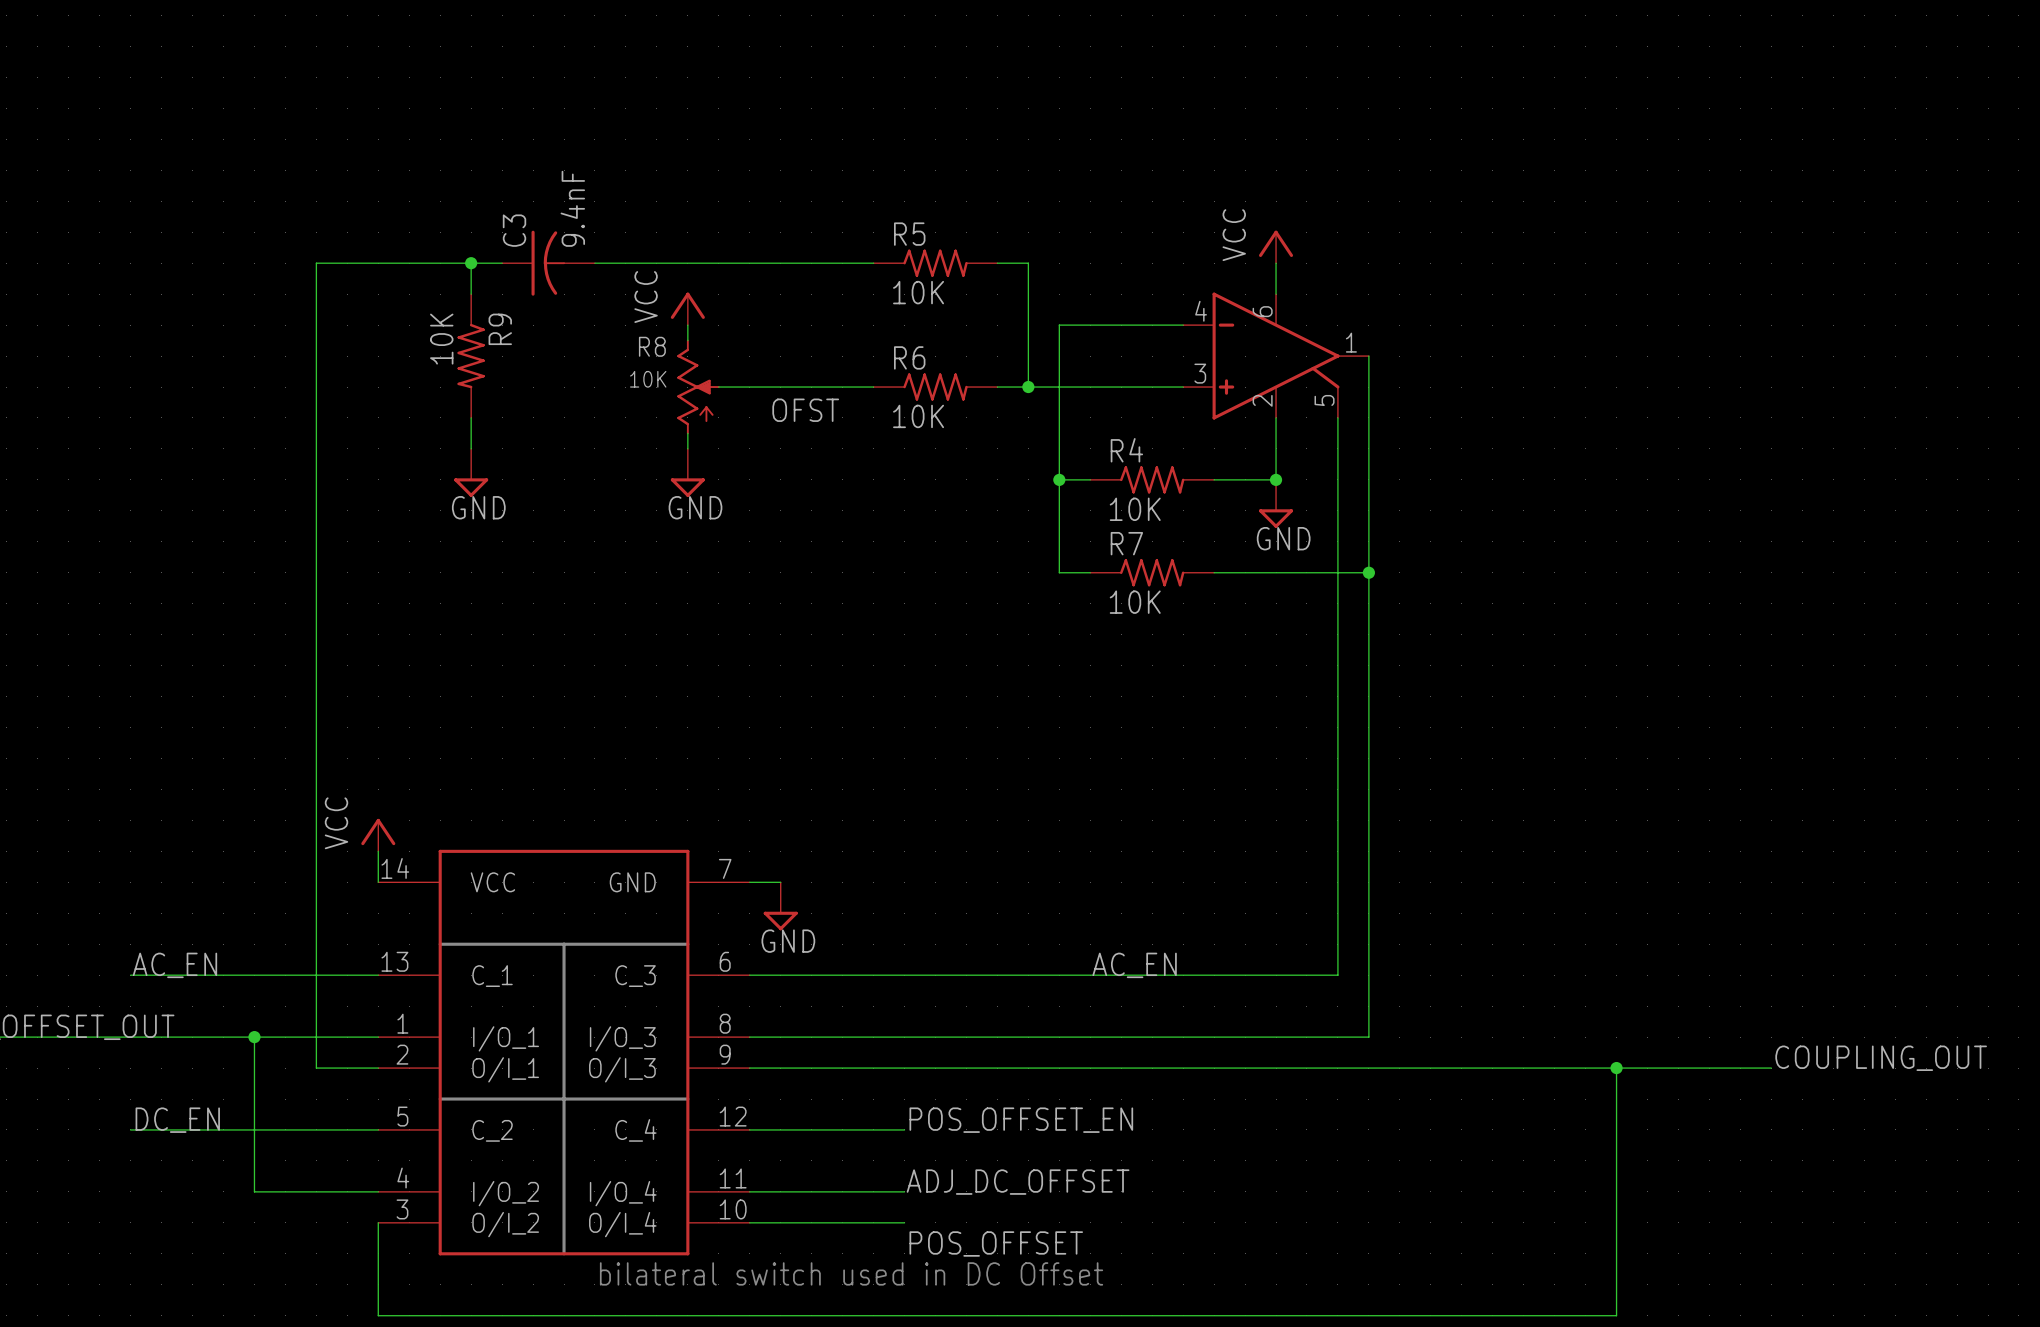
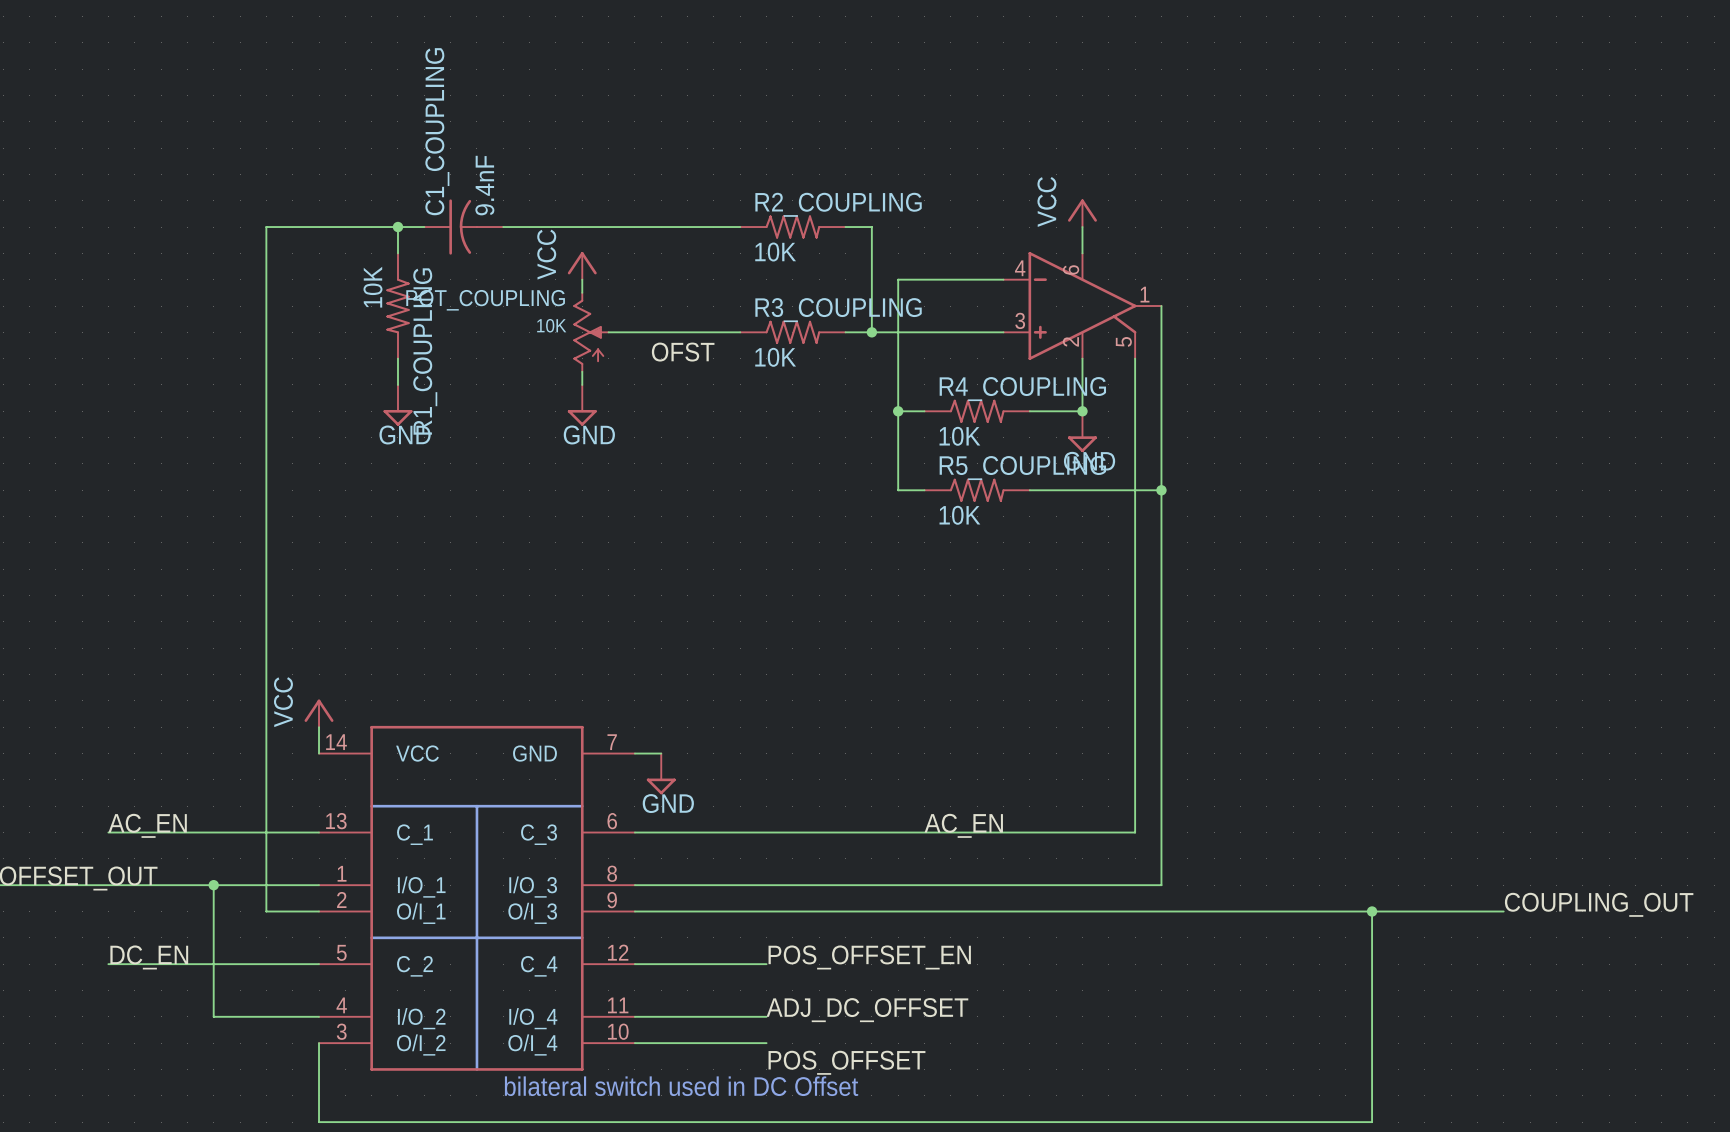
C3 name: C3 (514, 230) -> C1_COUPLING (437, 131)
R5 name: R5 (909, 234) -> R2_COUPLING (838, 204)
R9 name: R9 (500, 329) -> R1_COUPLING (425, 351)
R8 name: R8 (652, 346) -> POT_COUPLING (485, 300)
R6 name: R6 (909, 357) -> R3_COUPLING (838, 310)
R4 name: R4 (1126, 450) -> R4_COUPLING (1022, 389)
R7 name: R7 (1126, 543) -> R5_COUPLING (1022, 468)

